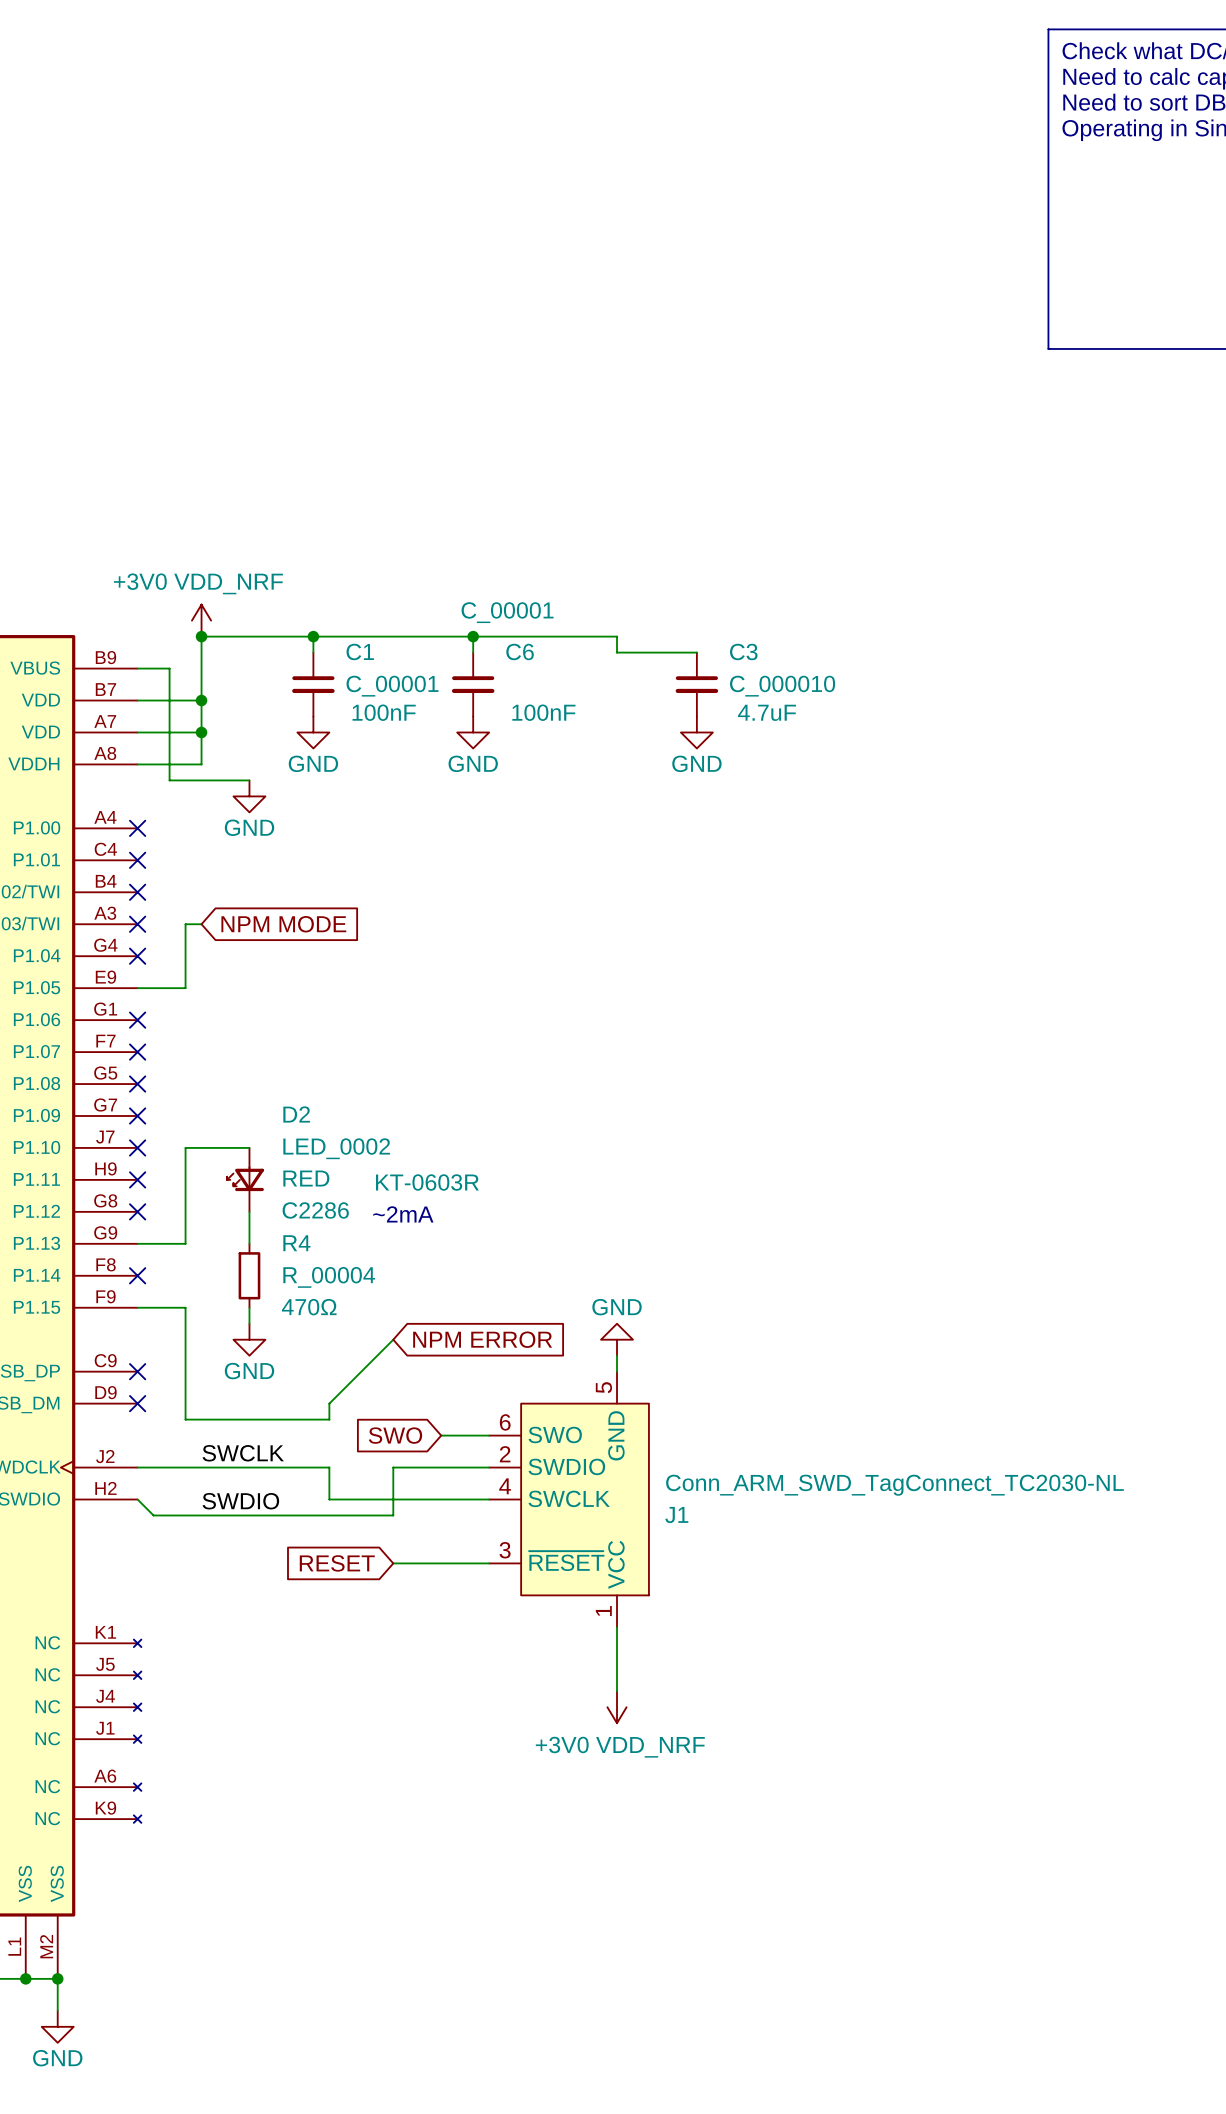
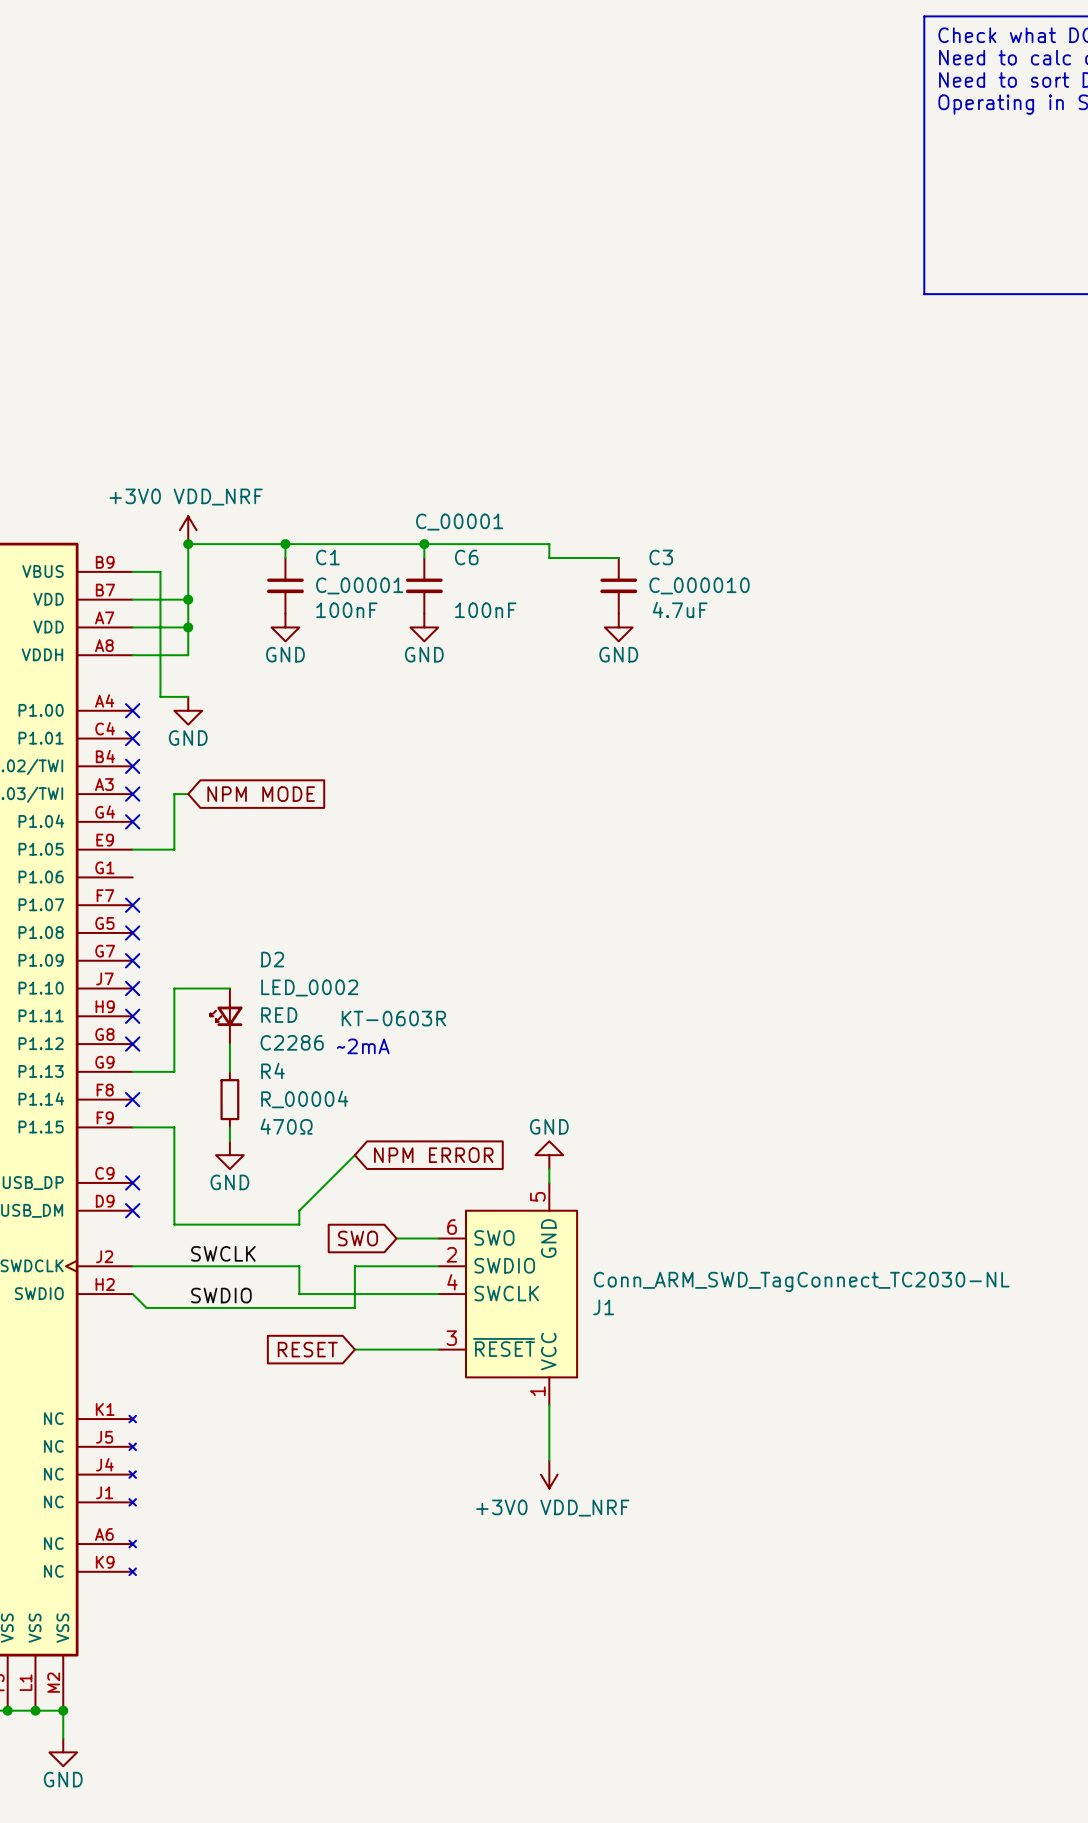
wire: (169, 780) (249, 780) -> (160, 669) (160, 696) (188, 696)
power symbol position: GND (249, 796) -> GND (188, 710)
no-connect mark: (137, 1020) -> none

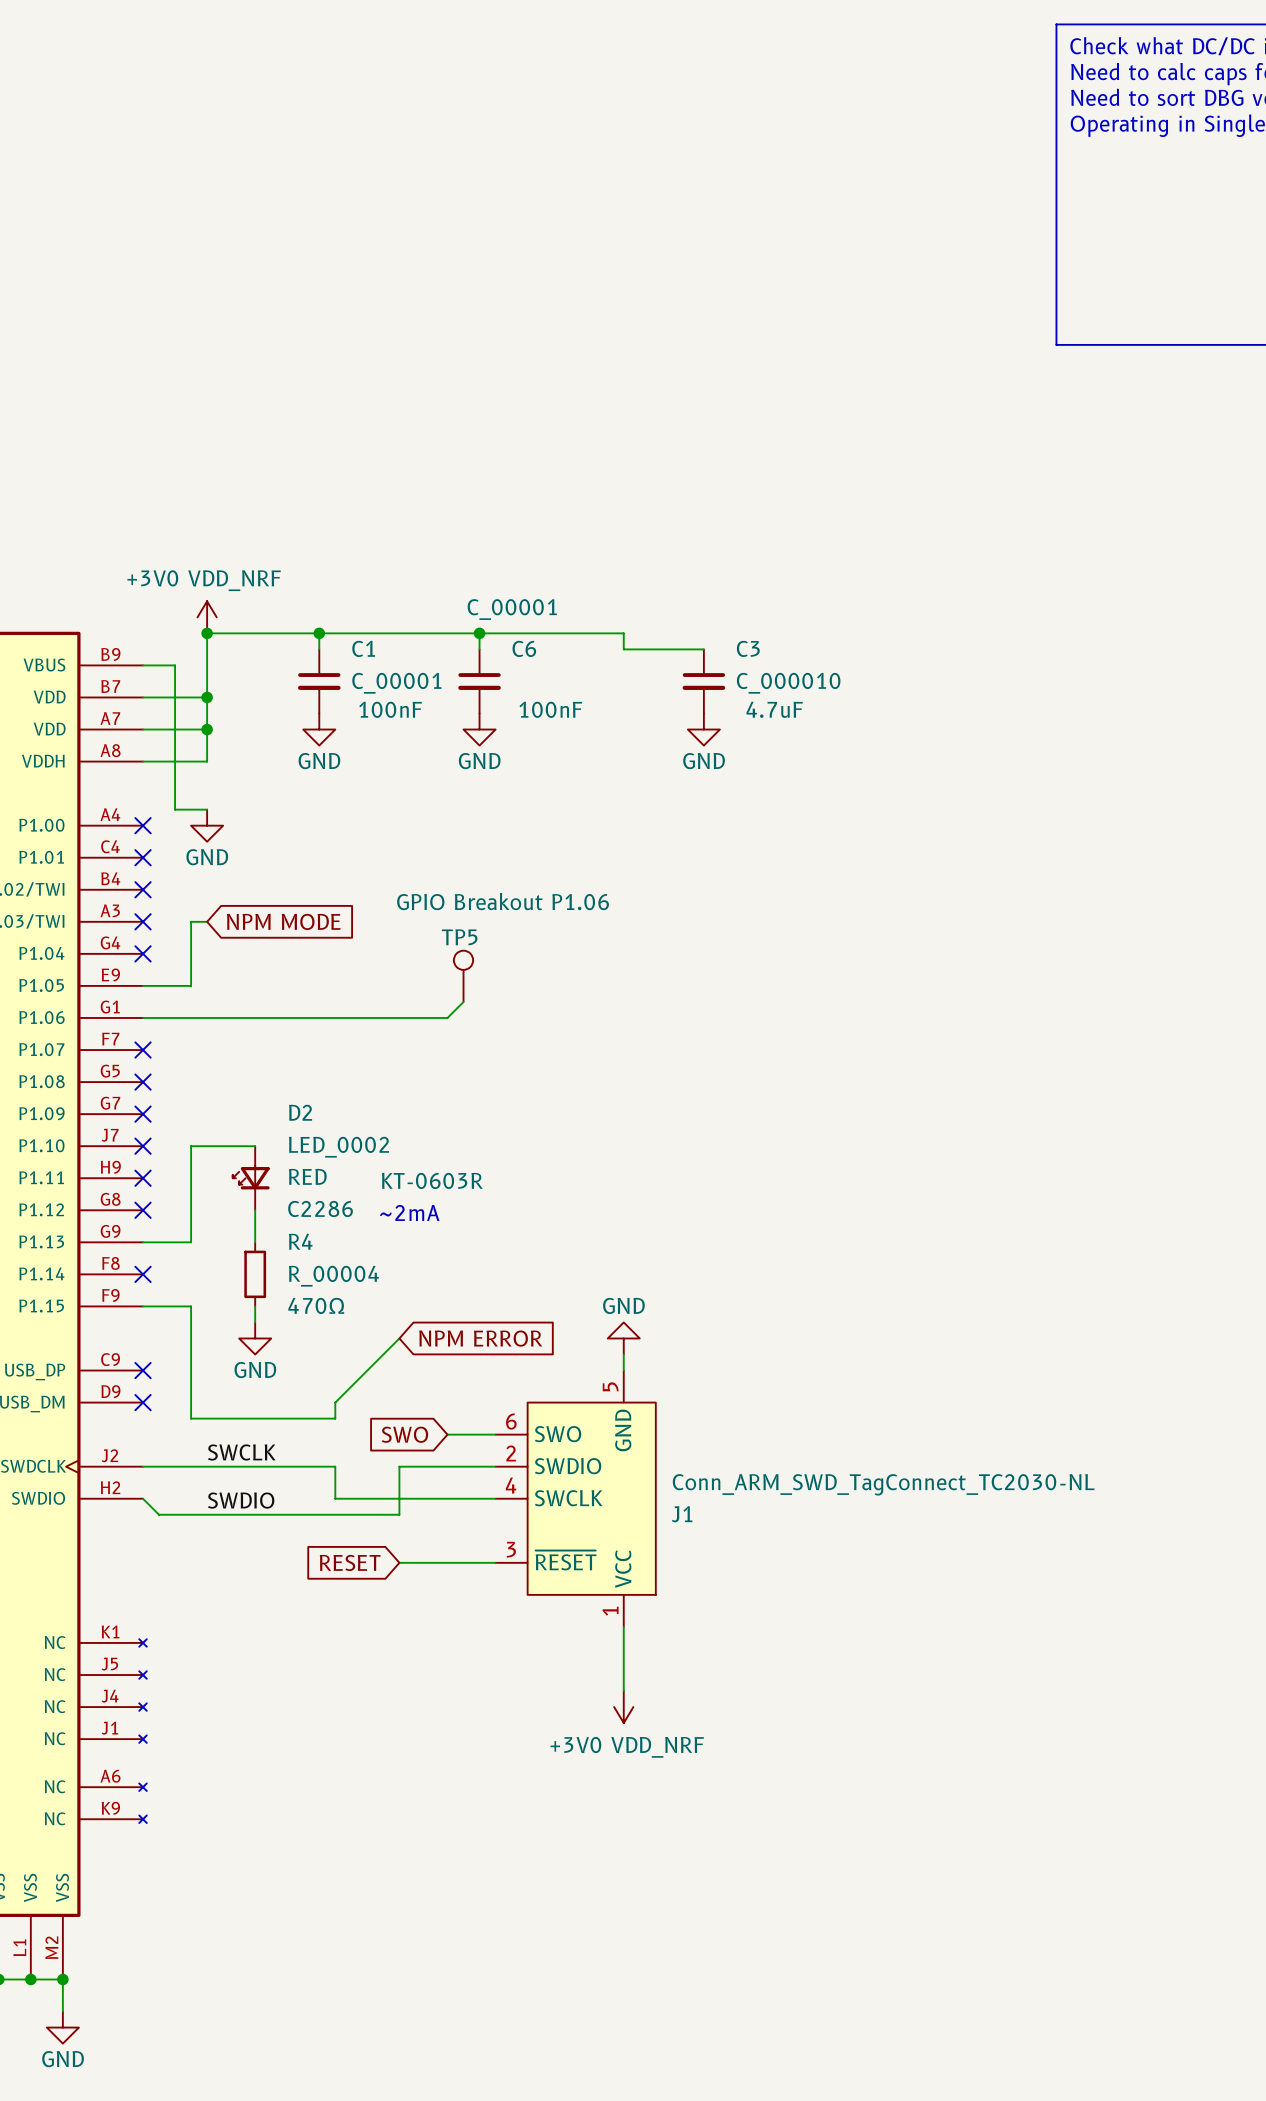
TP5: none -> GPIO Breakout P1.06 (463, 976)
wire: none -> (463, 1001) (447, 1017) (143, 1017)

